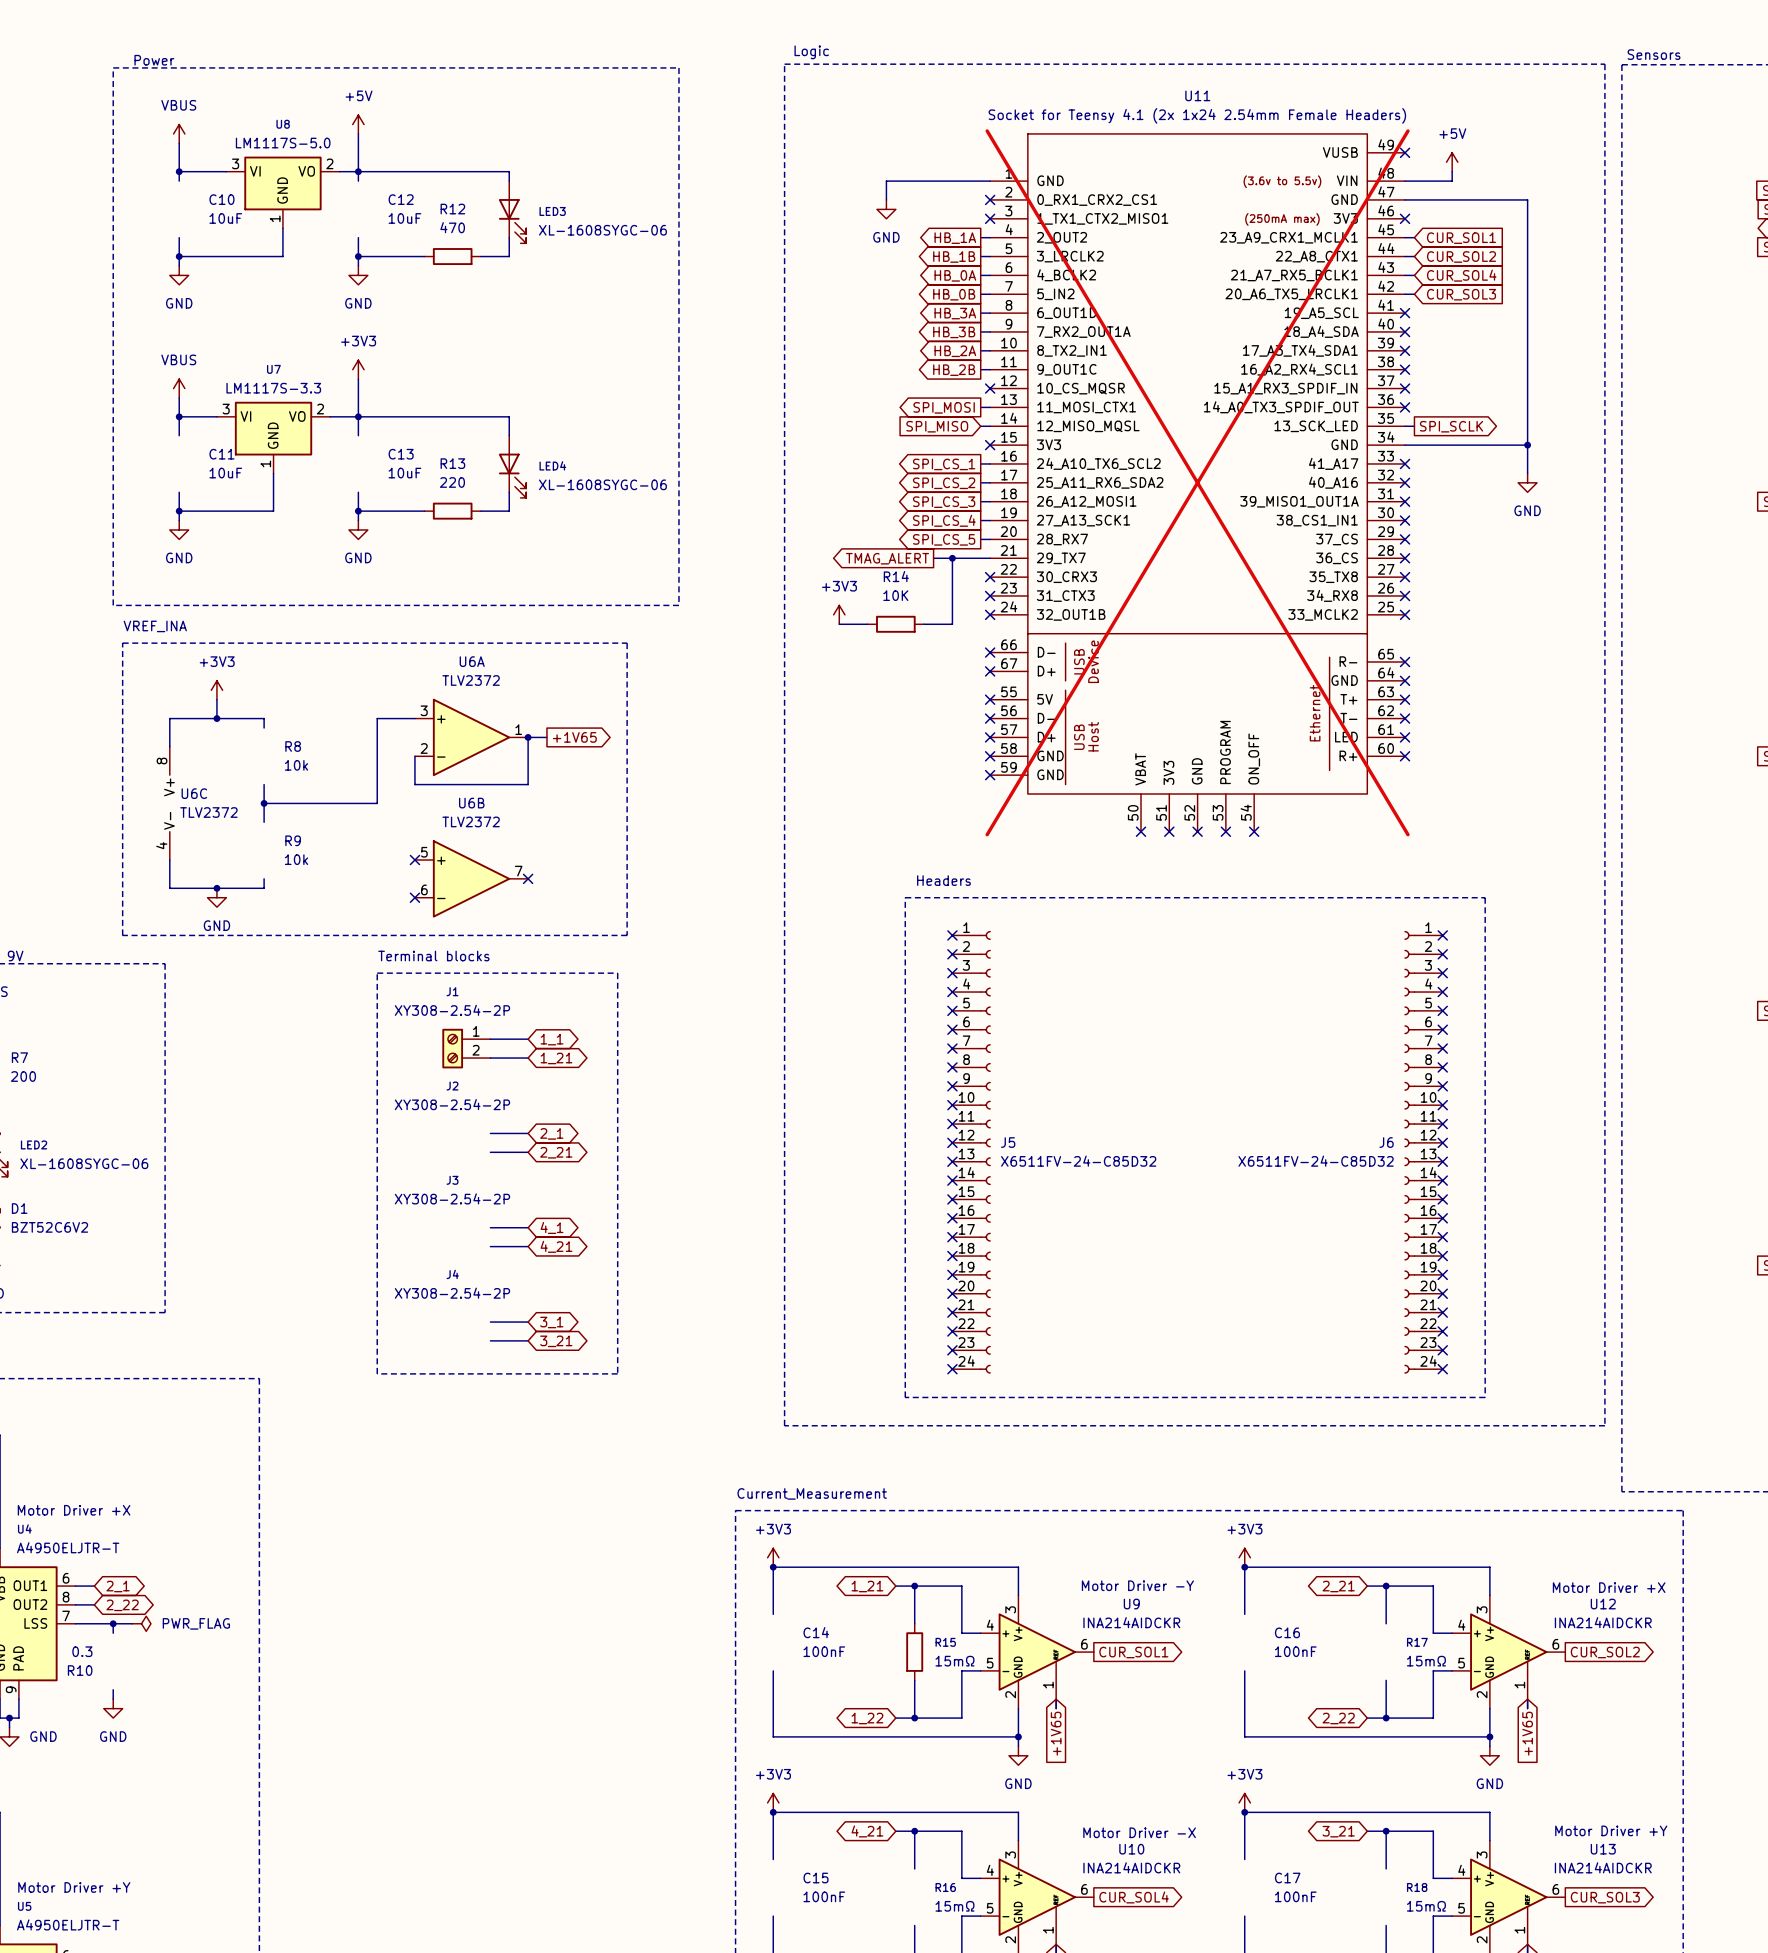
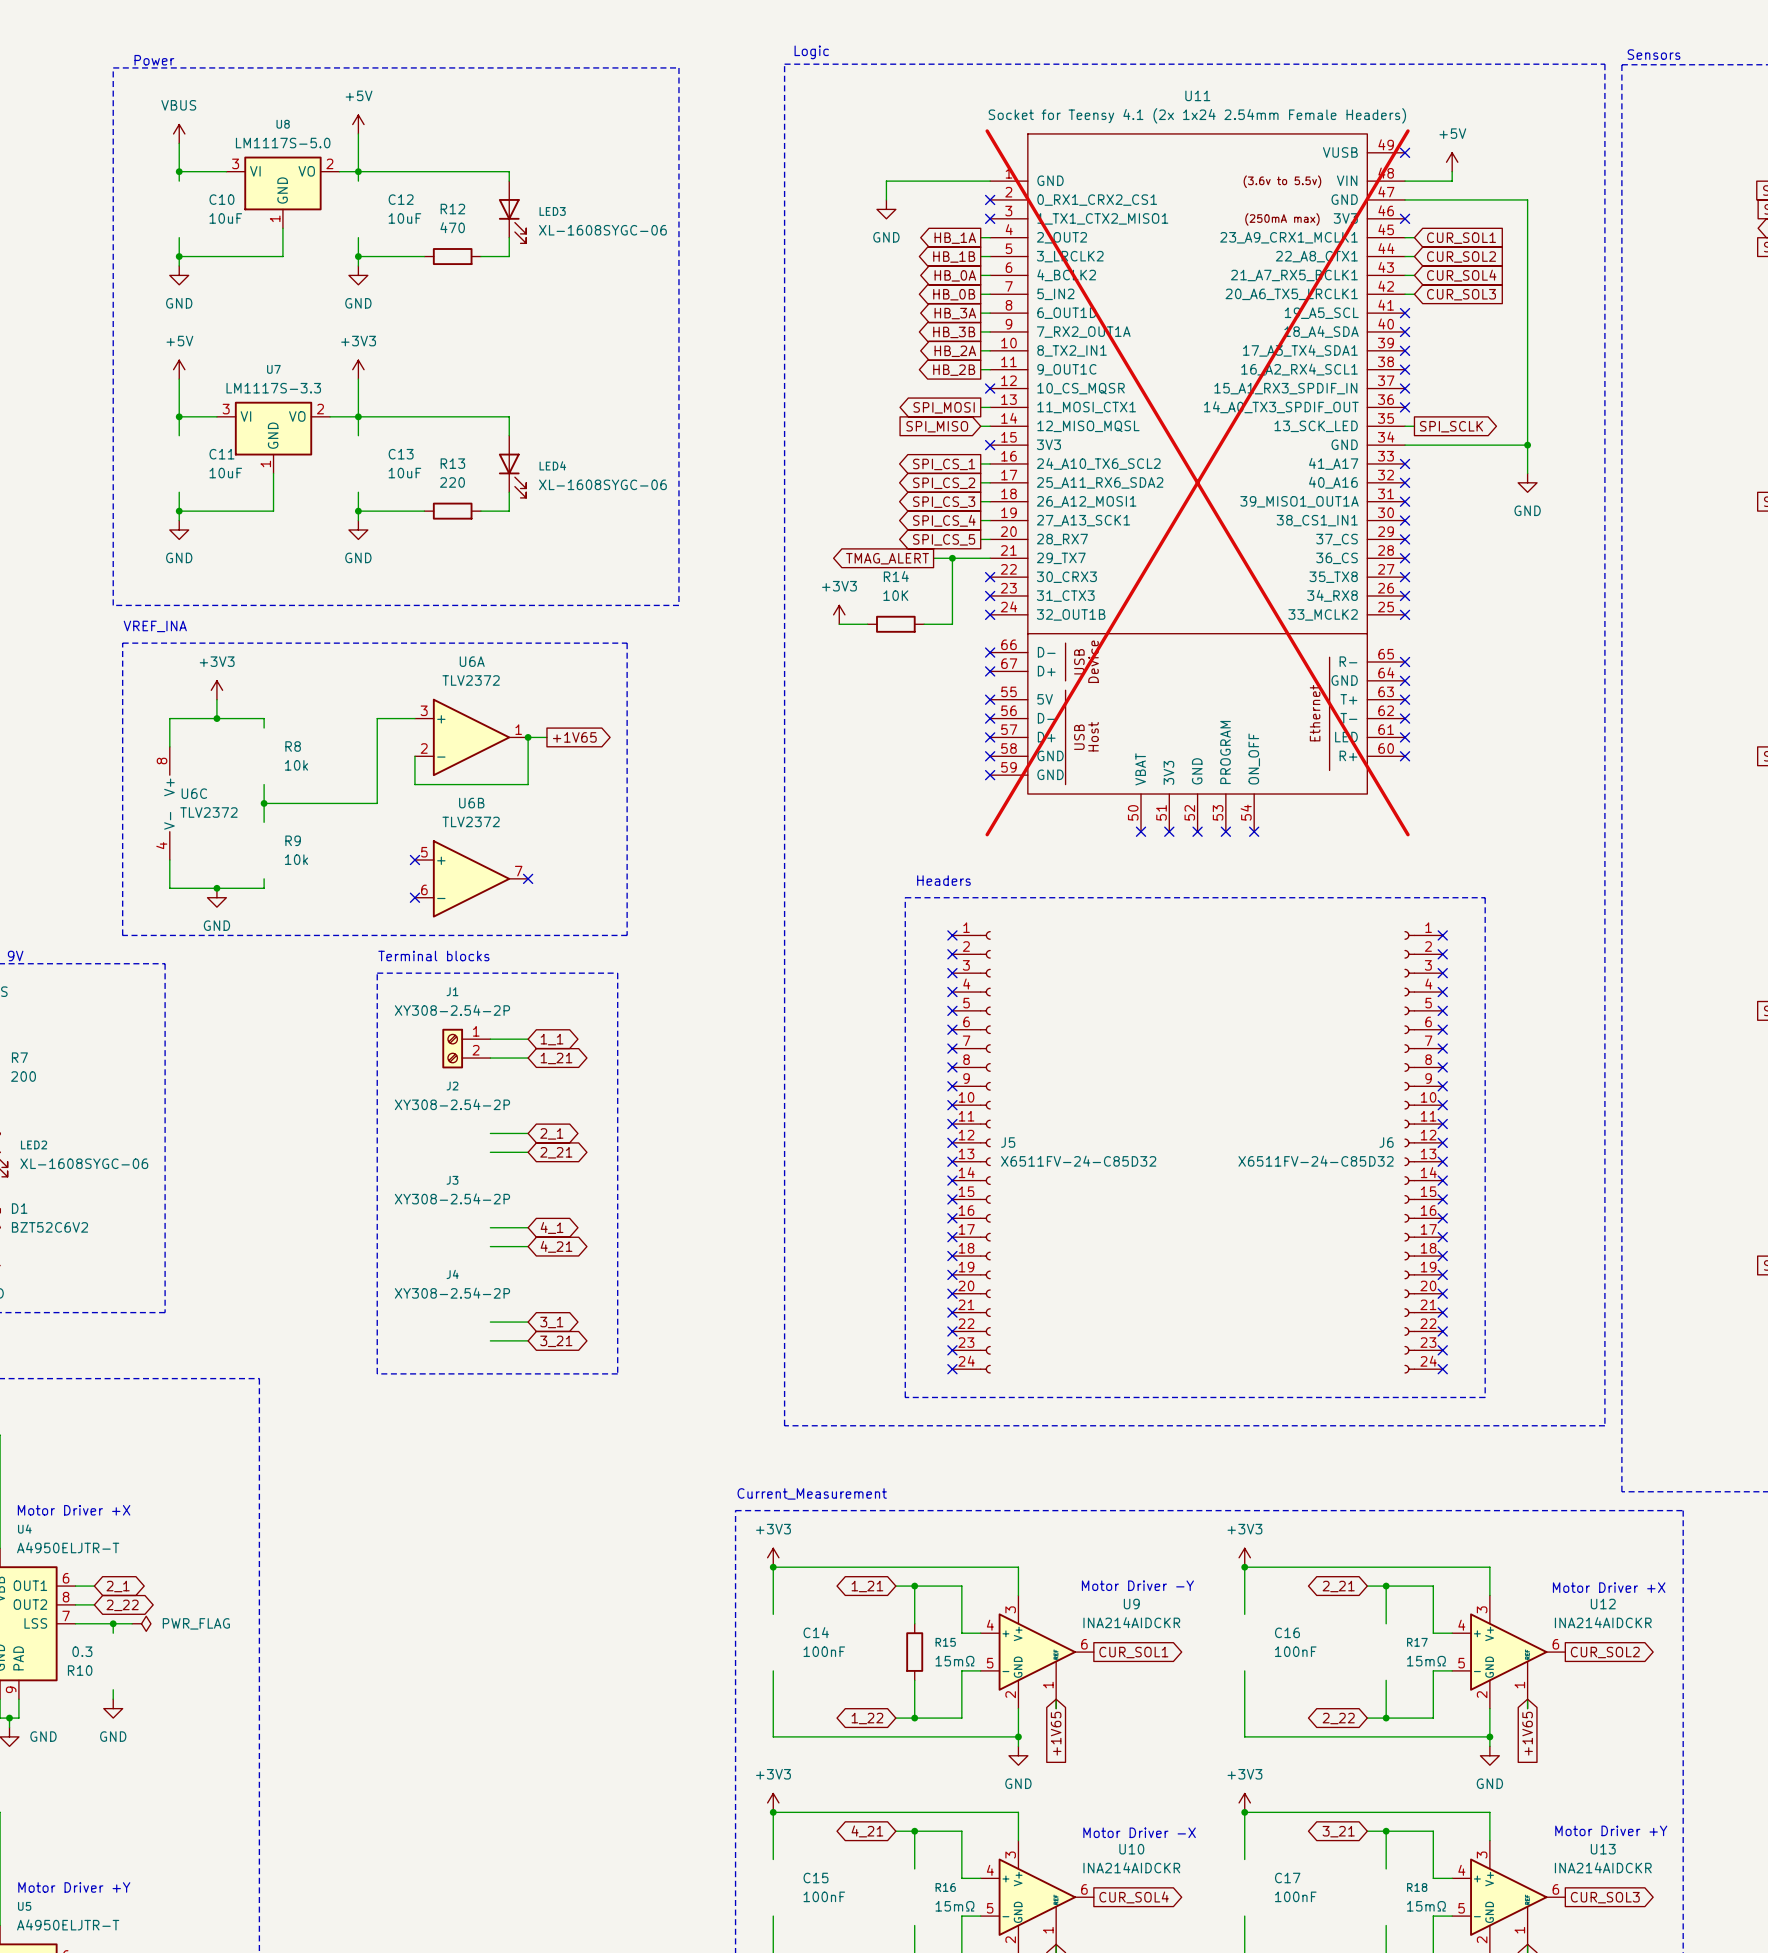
power symbol: none -> +5V (179, 369)
power symbol: VBUS (179, 388) -> none

